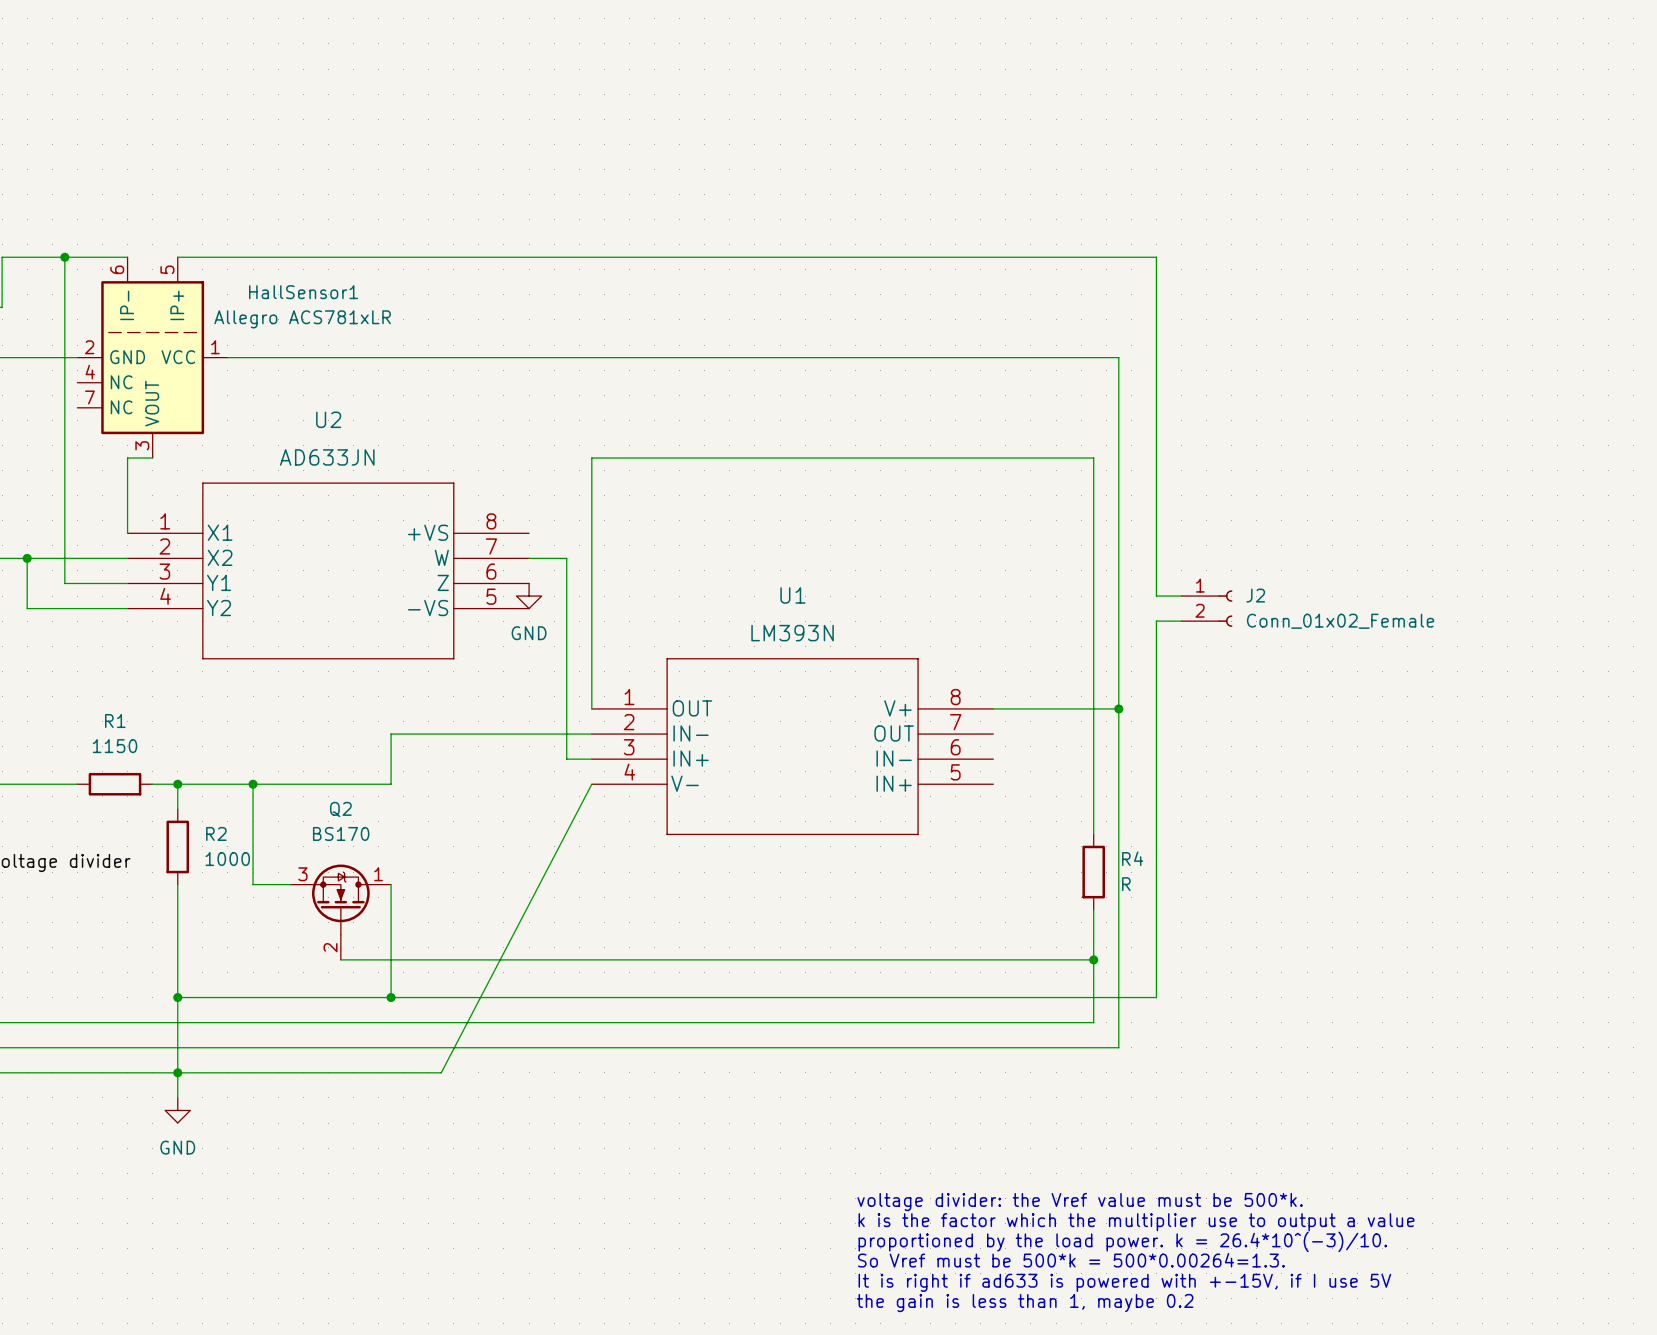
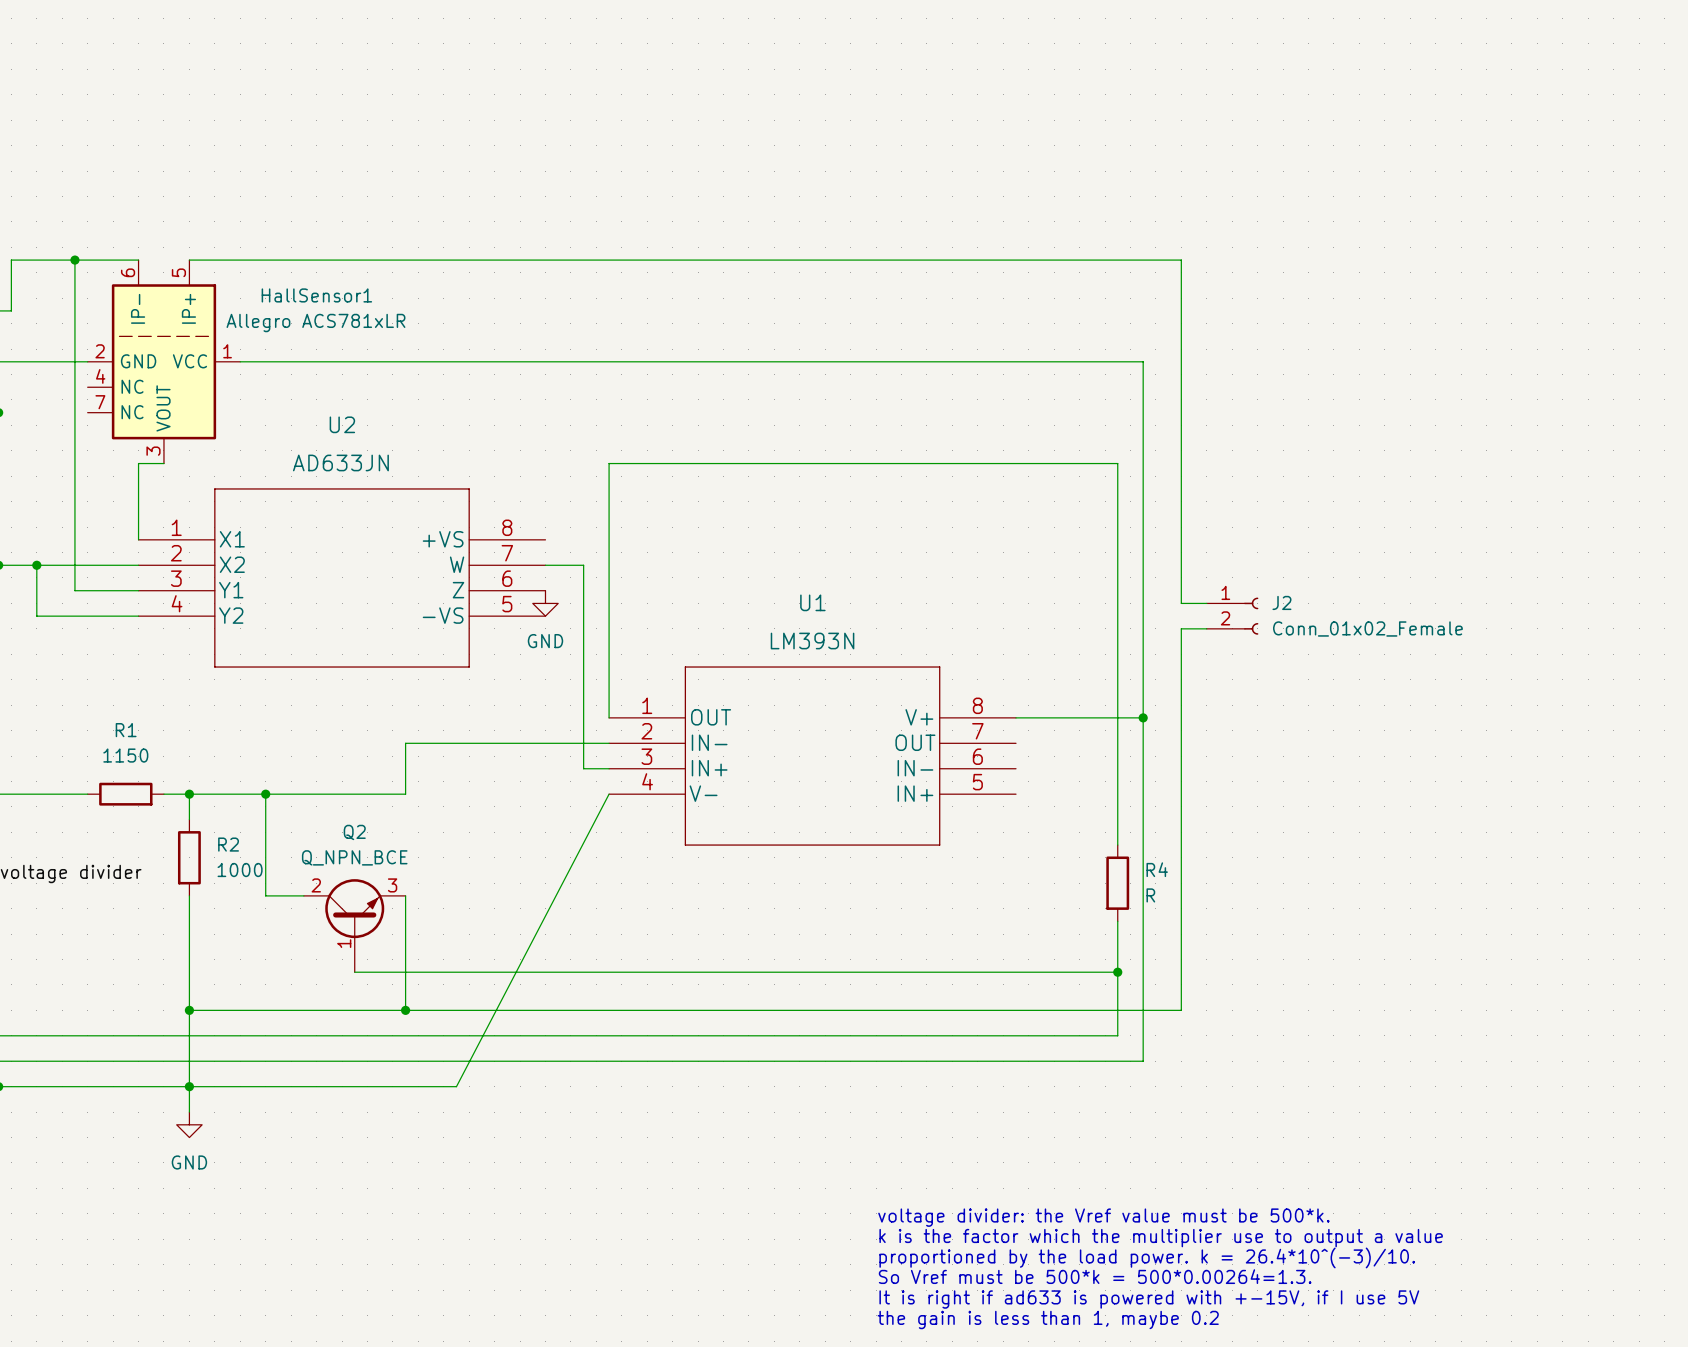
Q2 value: BS170 (341, 833) -> Q_NPN_BCE (354, 857)
Q2 symbol: [290, 864, 392, 960] -> [303, 879, 406, 973]

